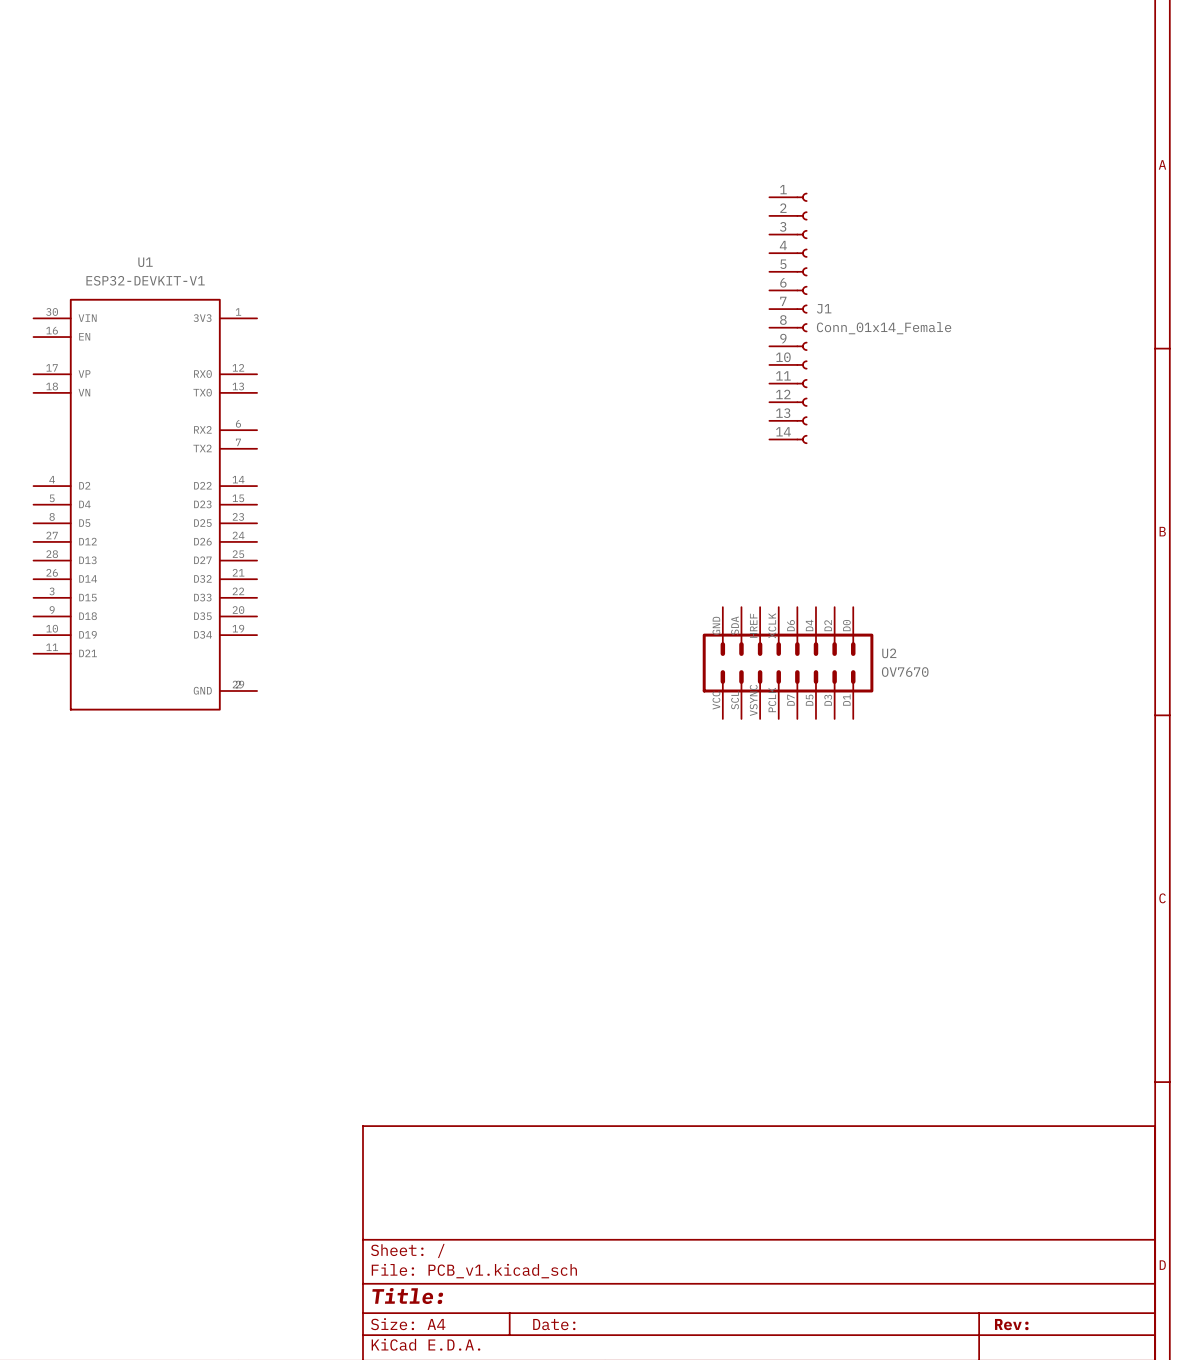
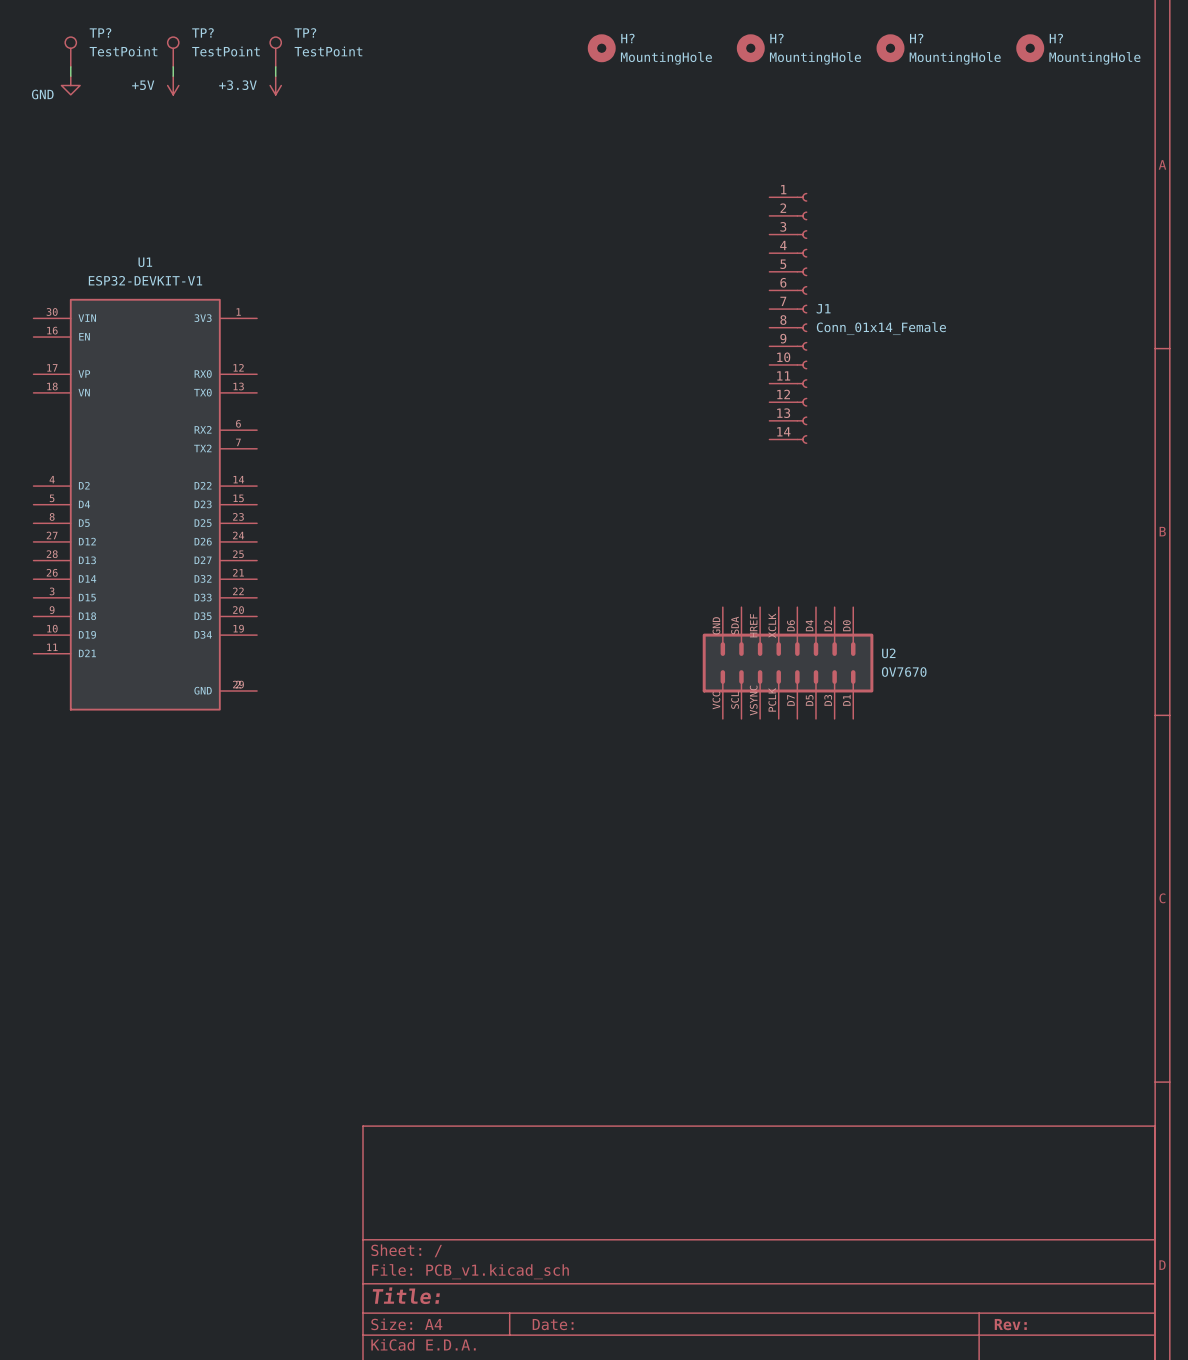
H?: none -> MountingHole (601, 48)
H?: none -> MountingHole (750, 48)
H?: none -> MountingHole (890, 48)
H?: none -> MountingHole (1030, 48)
TP?: none -> TestPoint (70, 51)
TP?: none -> TestPoint (173, 51)
TP?: none -> TestPoint (275, 51)
wire: none -> (70, 66) (70, 76)
wire: none -> (173, 66) (173, 76)
wire: none -> (275, 66) (275, 76)
power symbol: none -> GND (70, 85)
power symbol: none -> +5V (173, 85)
power symbol: none -> +3.3V (275, 85)

